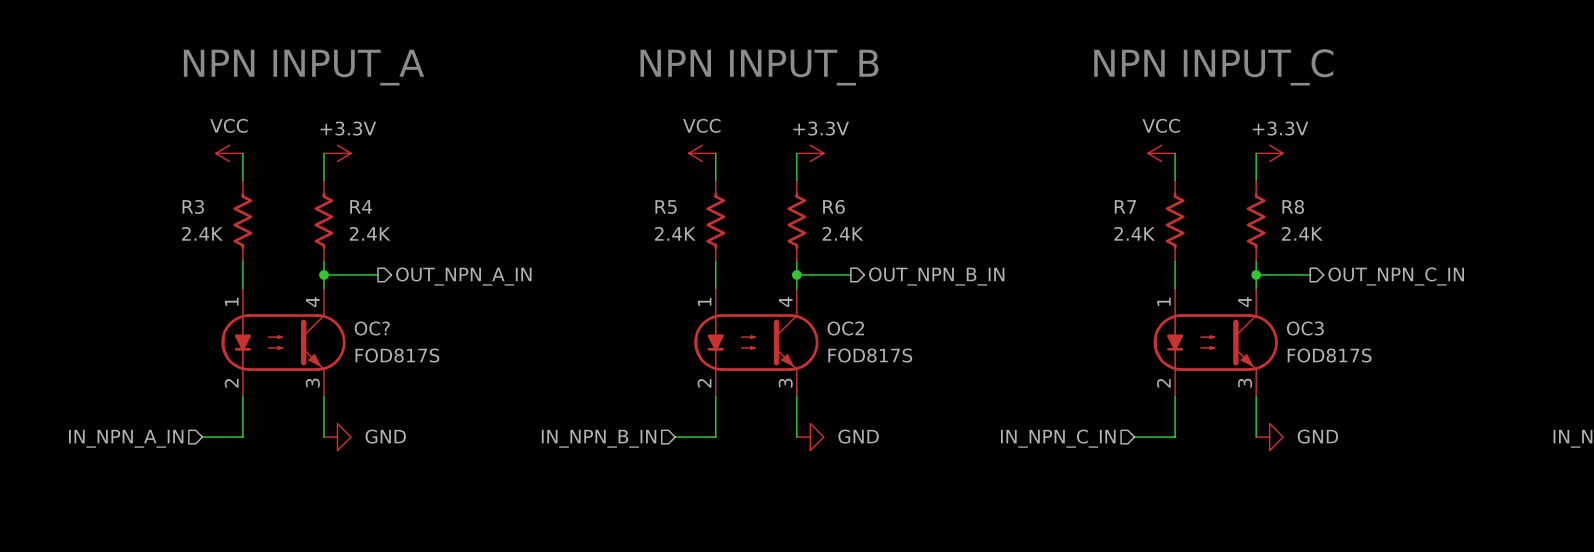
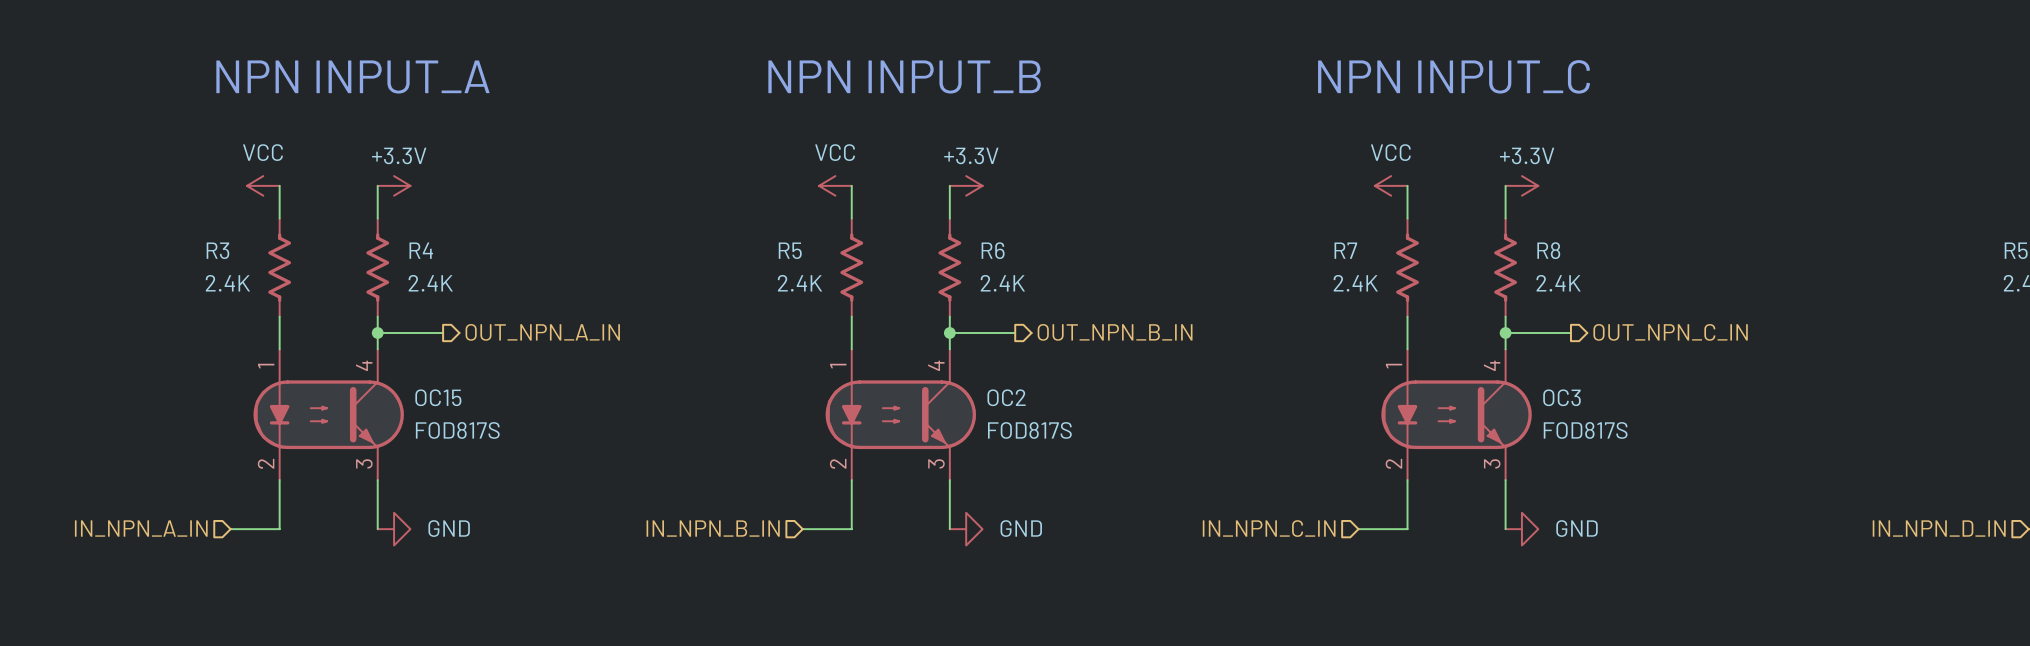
OC? name: OC? (372, 328) -> OC15 (438, 397)

